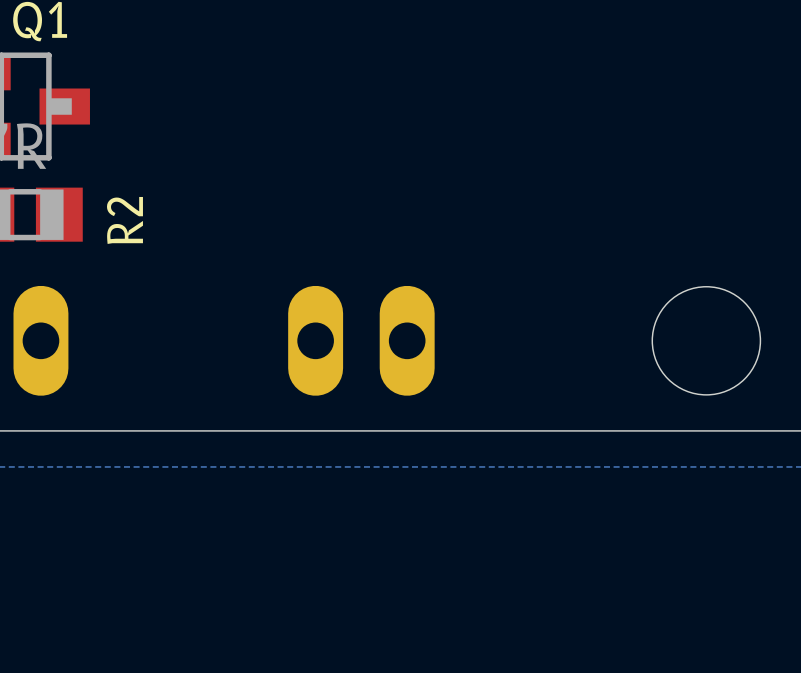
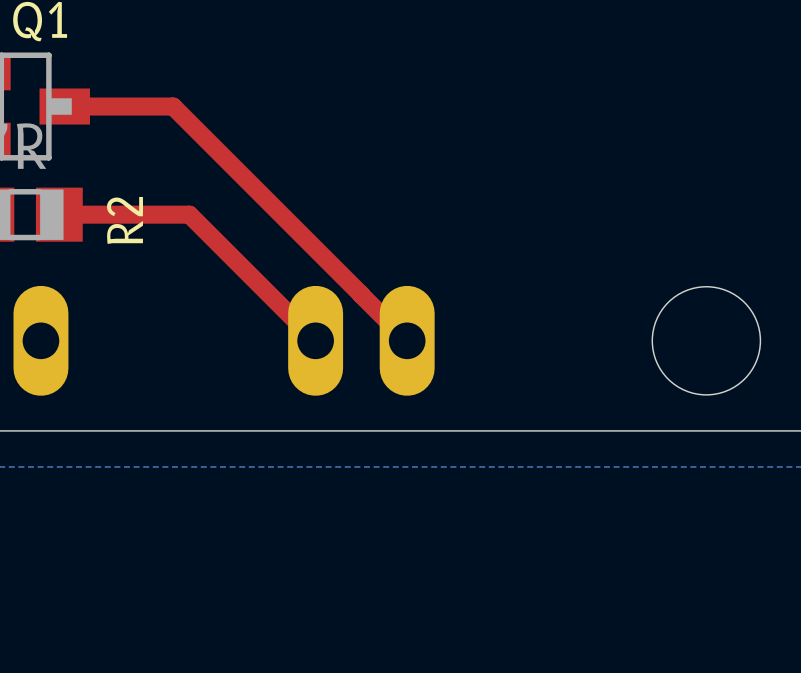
top track: none -> (64, 106) (173, 106) (407, 340)
top track: none -> (59, 214) (189, 214) (315, 340)

